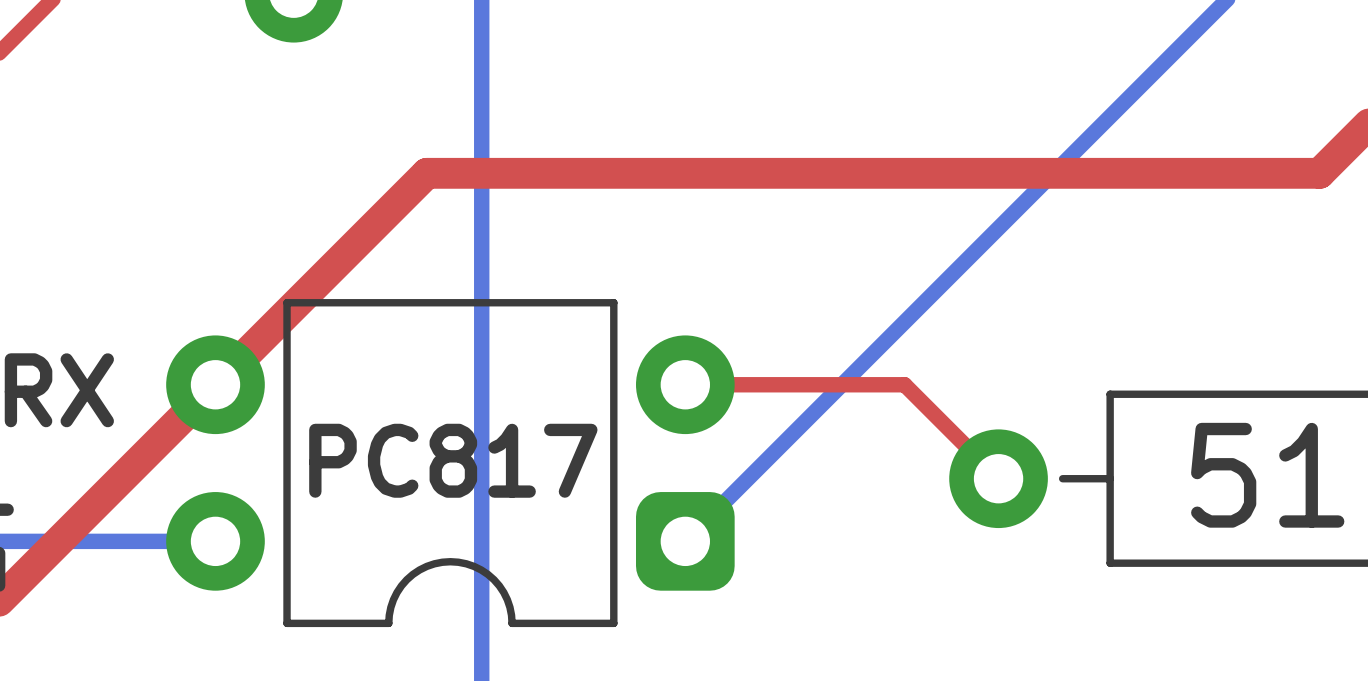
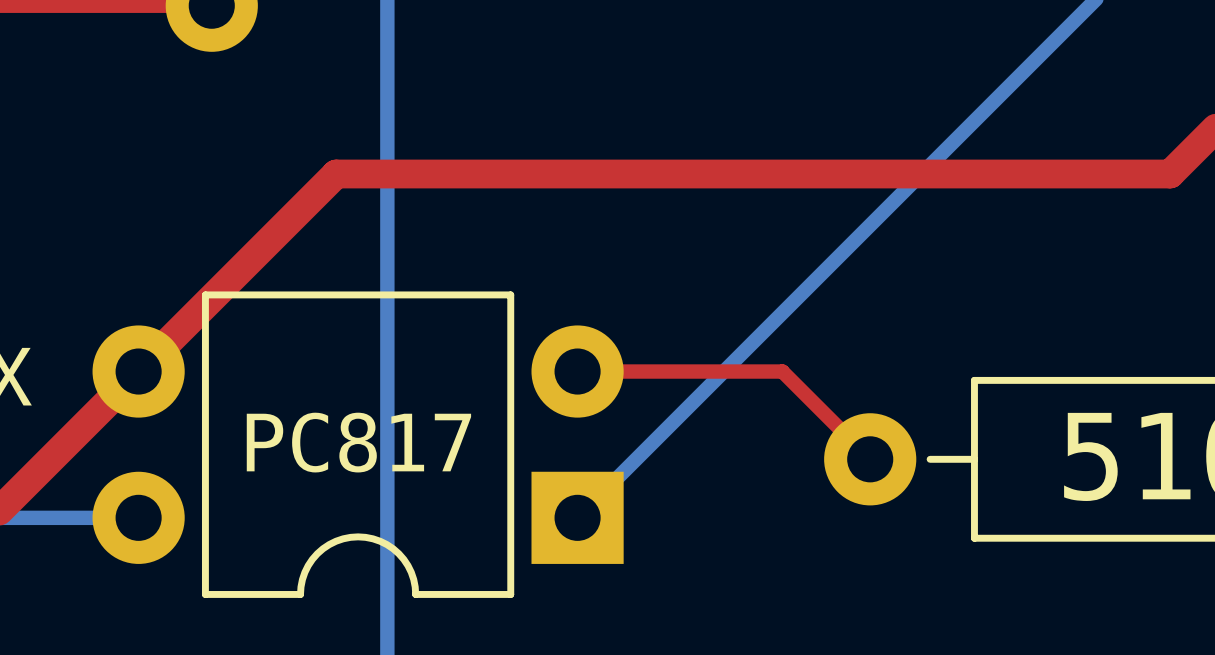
part footprint: [166, 299, 735, 628] -> [92, 291, 624, 598]

